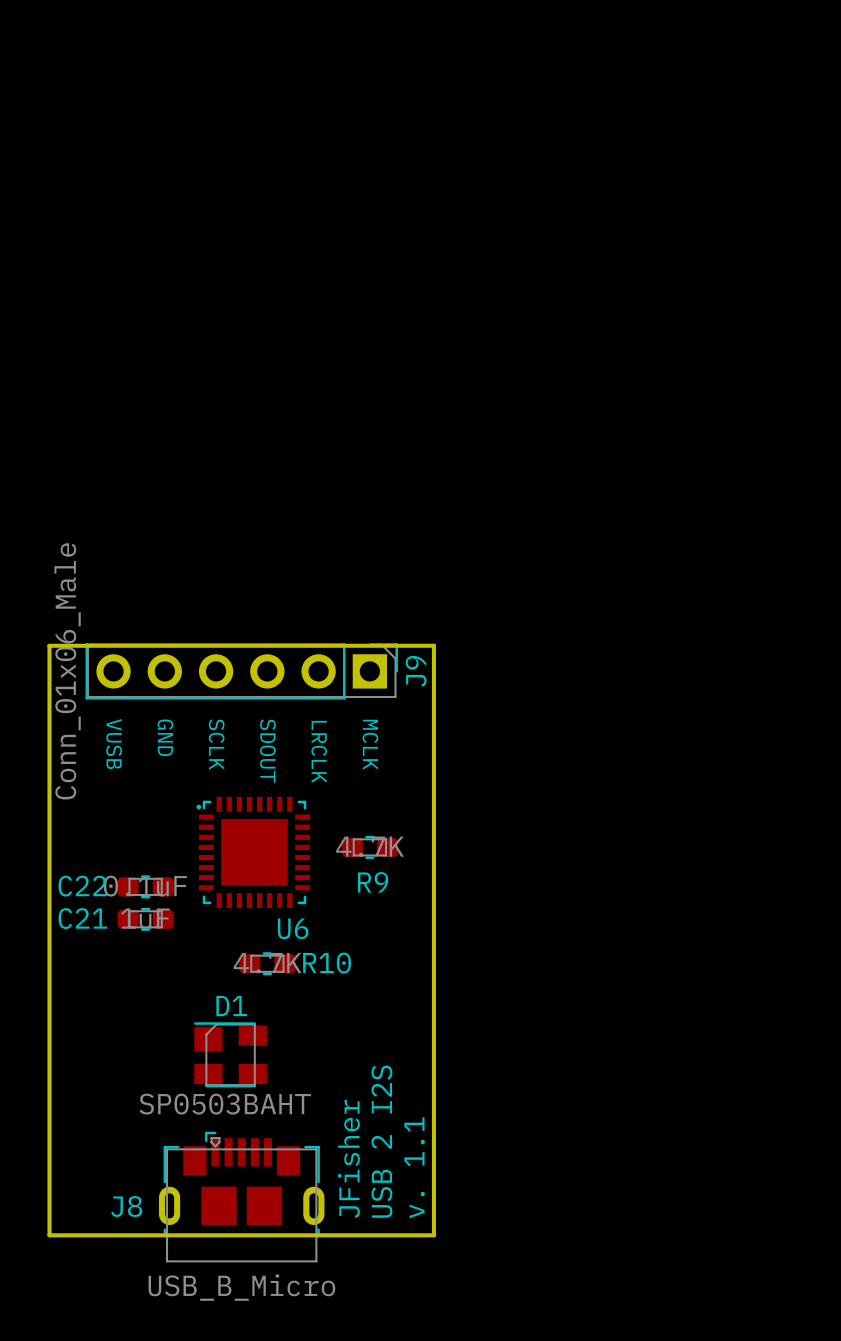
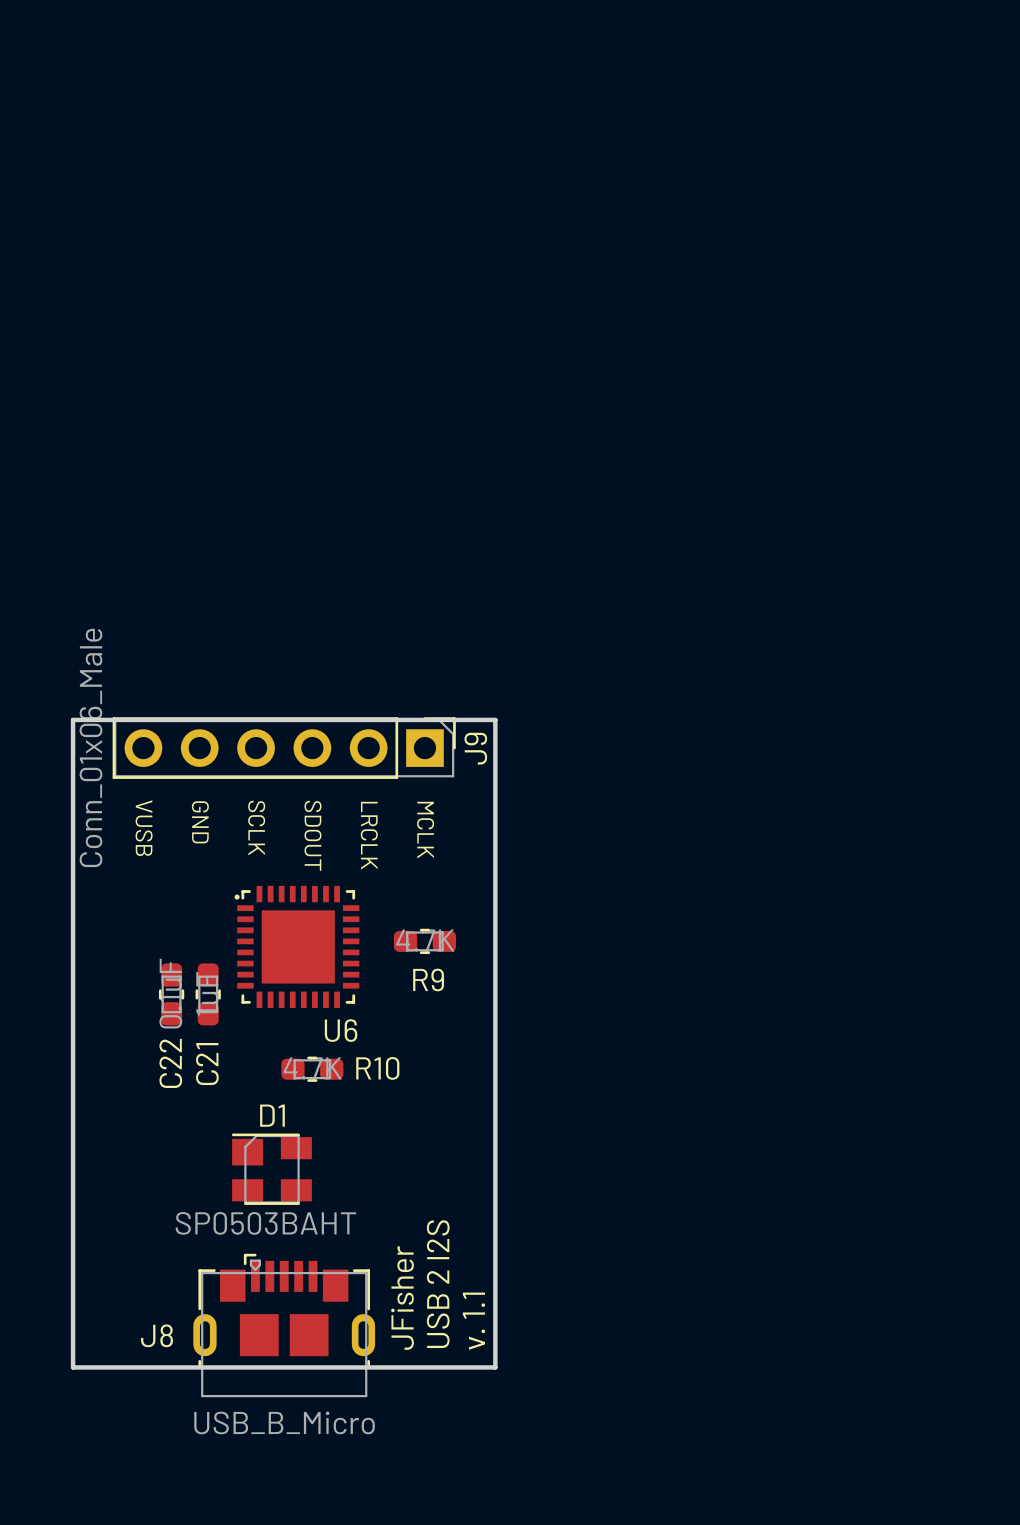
C22 name position: C22 (82, 886) -> C22 (170, 1063)
C22 rotation: 0° (145, 886) -> 90° clockwise (171, 994)
C21 name position: C21 (82, 918) -> C21 (207, 1064)
C21 rotation: 0° (145, 919) -> 90° clockwise (208, 994)
C21 position: (145, 919) -> (208, 994)

